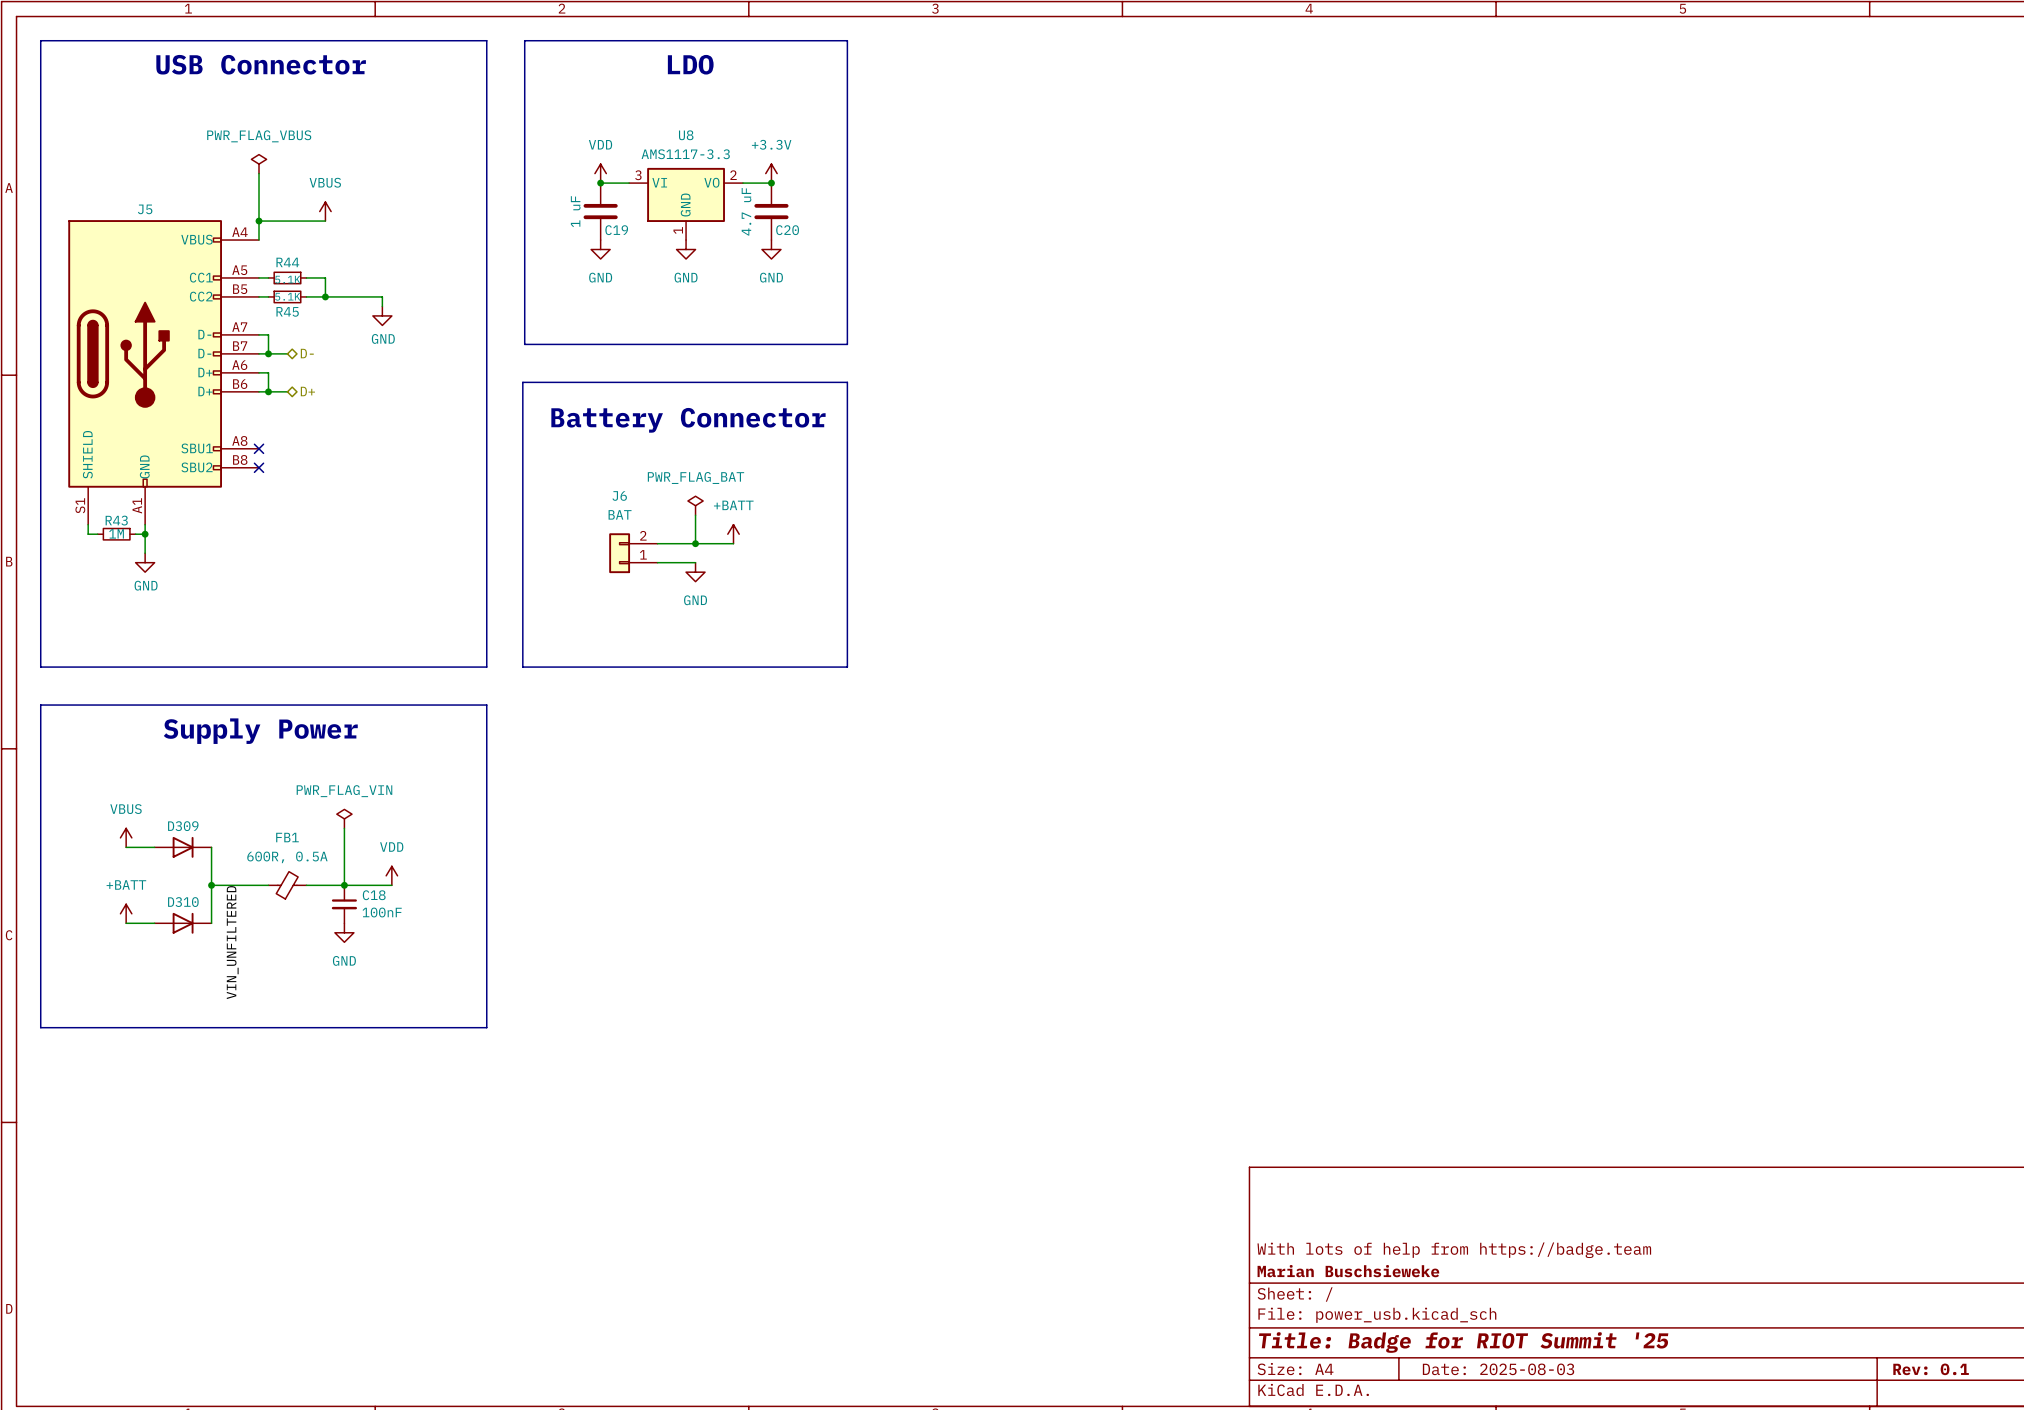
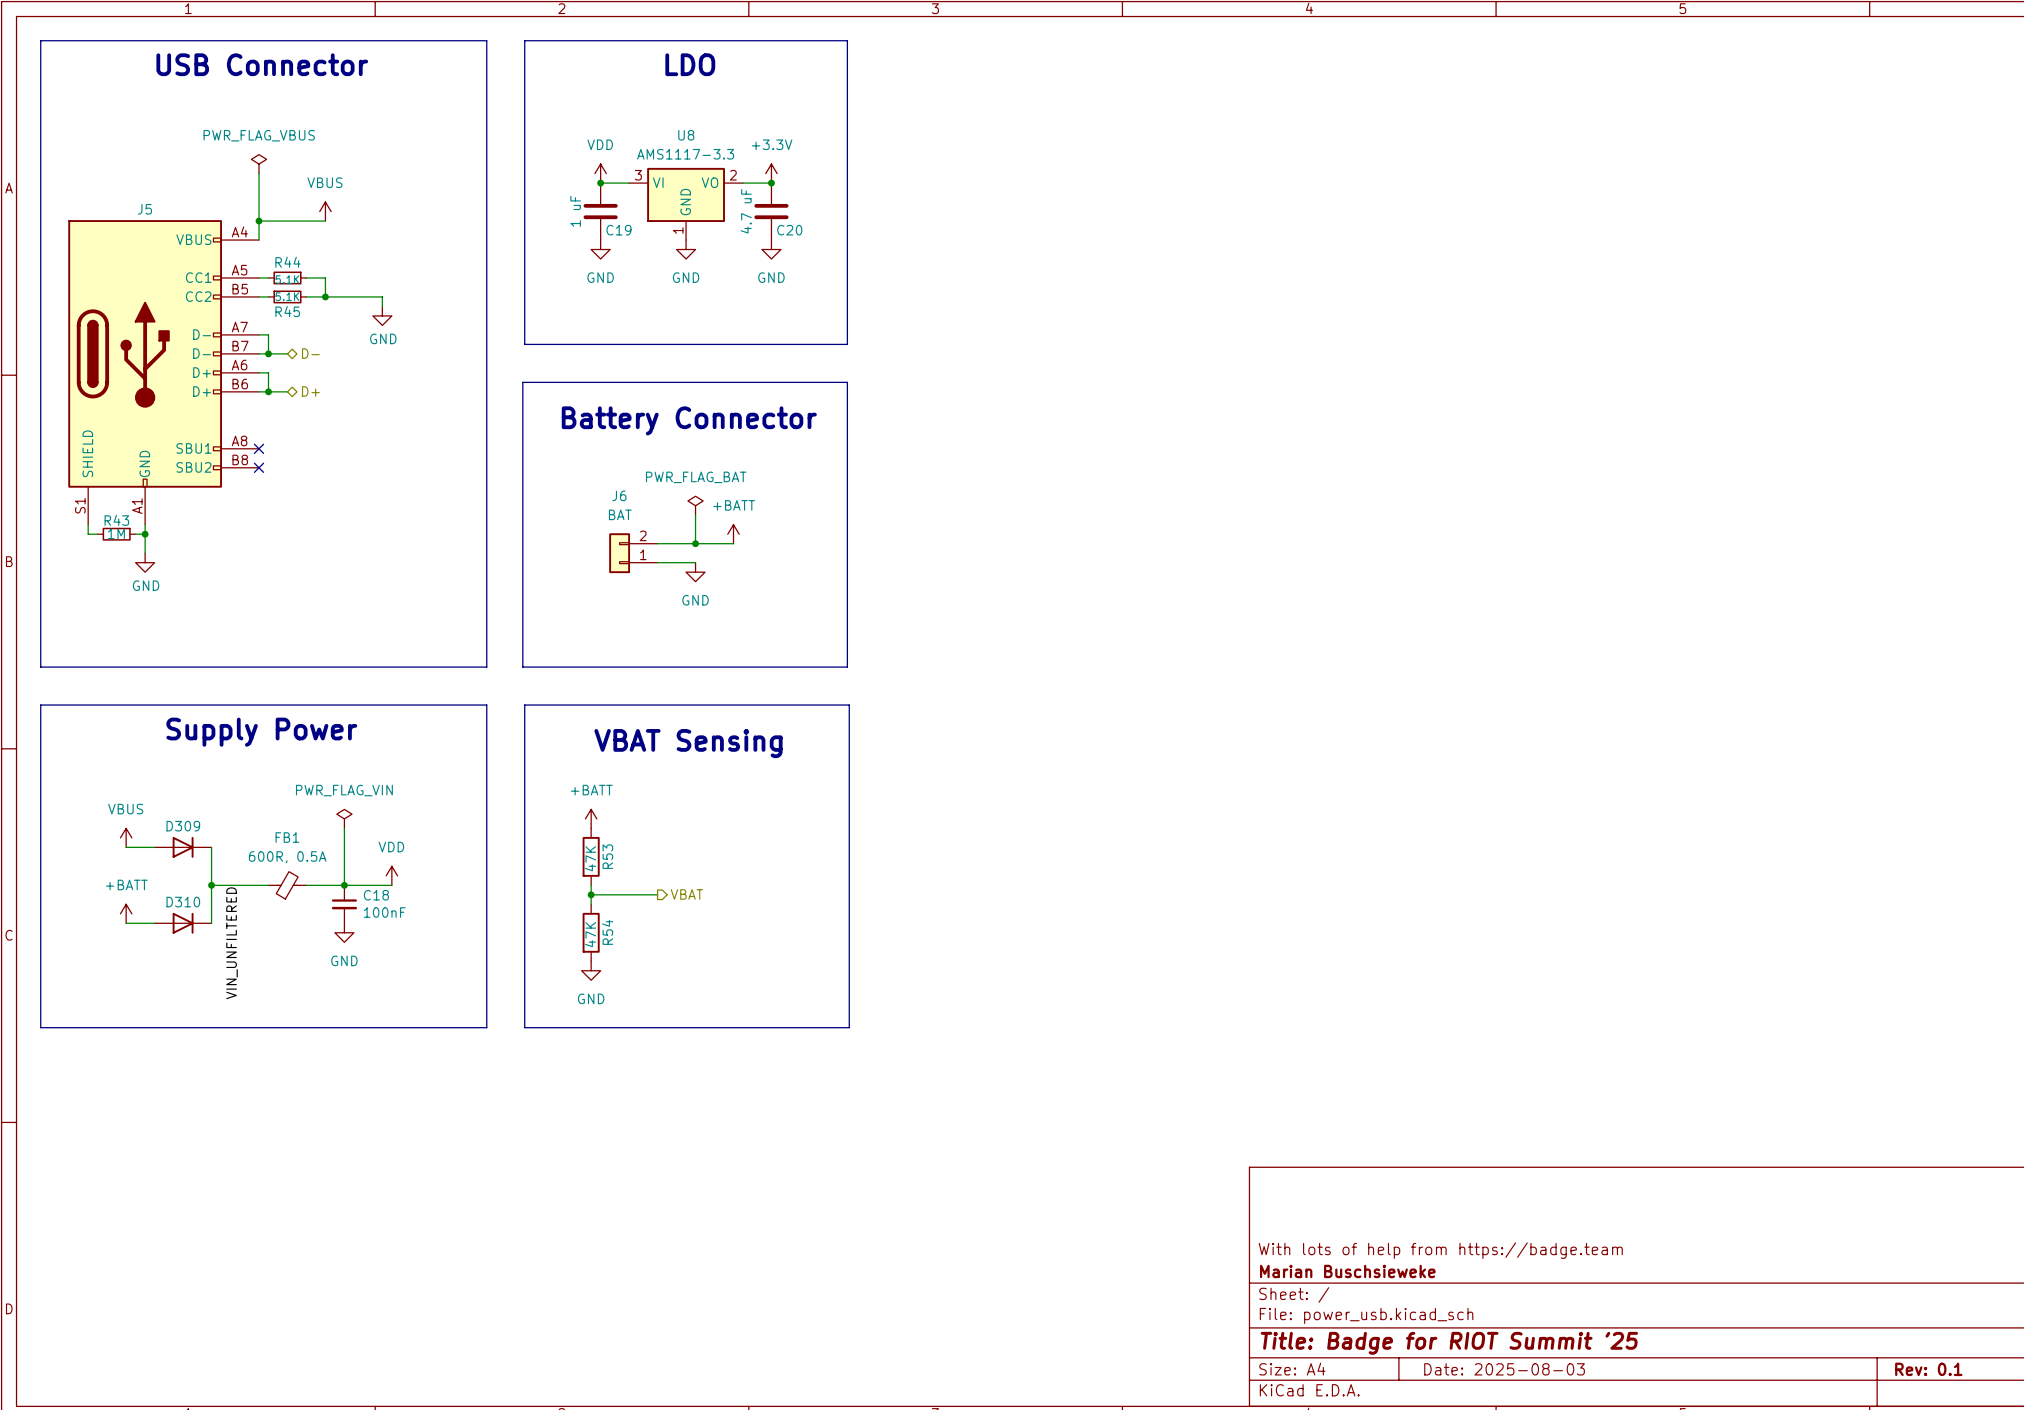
line: none -> (524, 705) (849, 705) (849, 1027) (524, 1027) (524, 705)
text: none -> VBAT Sensing (688, 743)
power symbol: none -> +BATT (591, 818)
R53: none -> 47K (591, 856)
wire: none -> (591, 885) (591, 904)
wire: none -> (591, 894) (657, 894)
junction: none -> (591, 894)
hierarchical label: none -> VBAT (686, 894)
R54: none -> 47K (591, 932)
power symbol: none -> GND (591, 970)

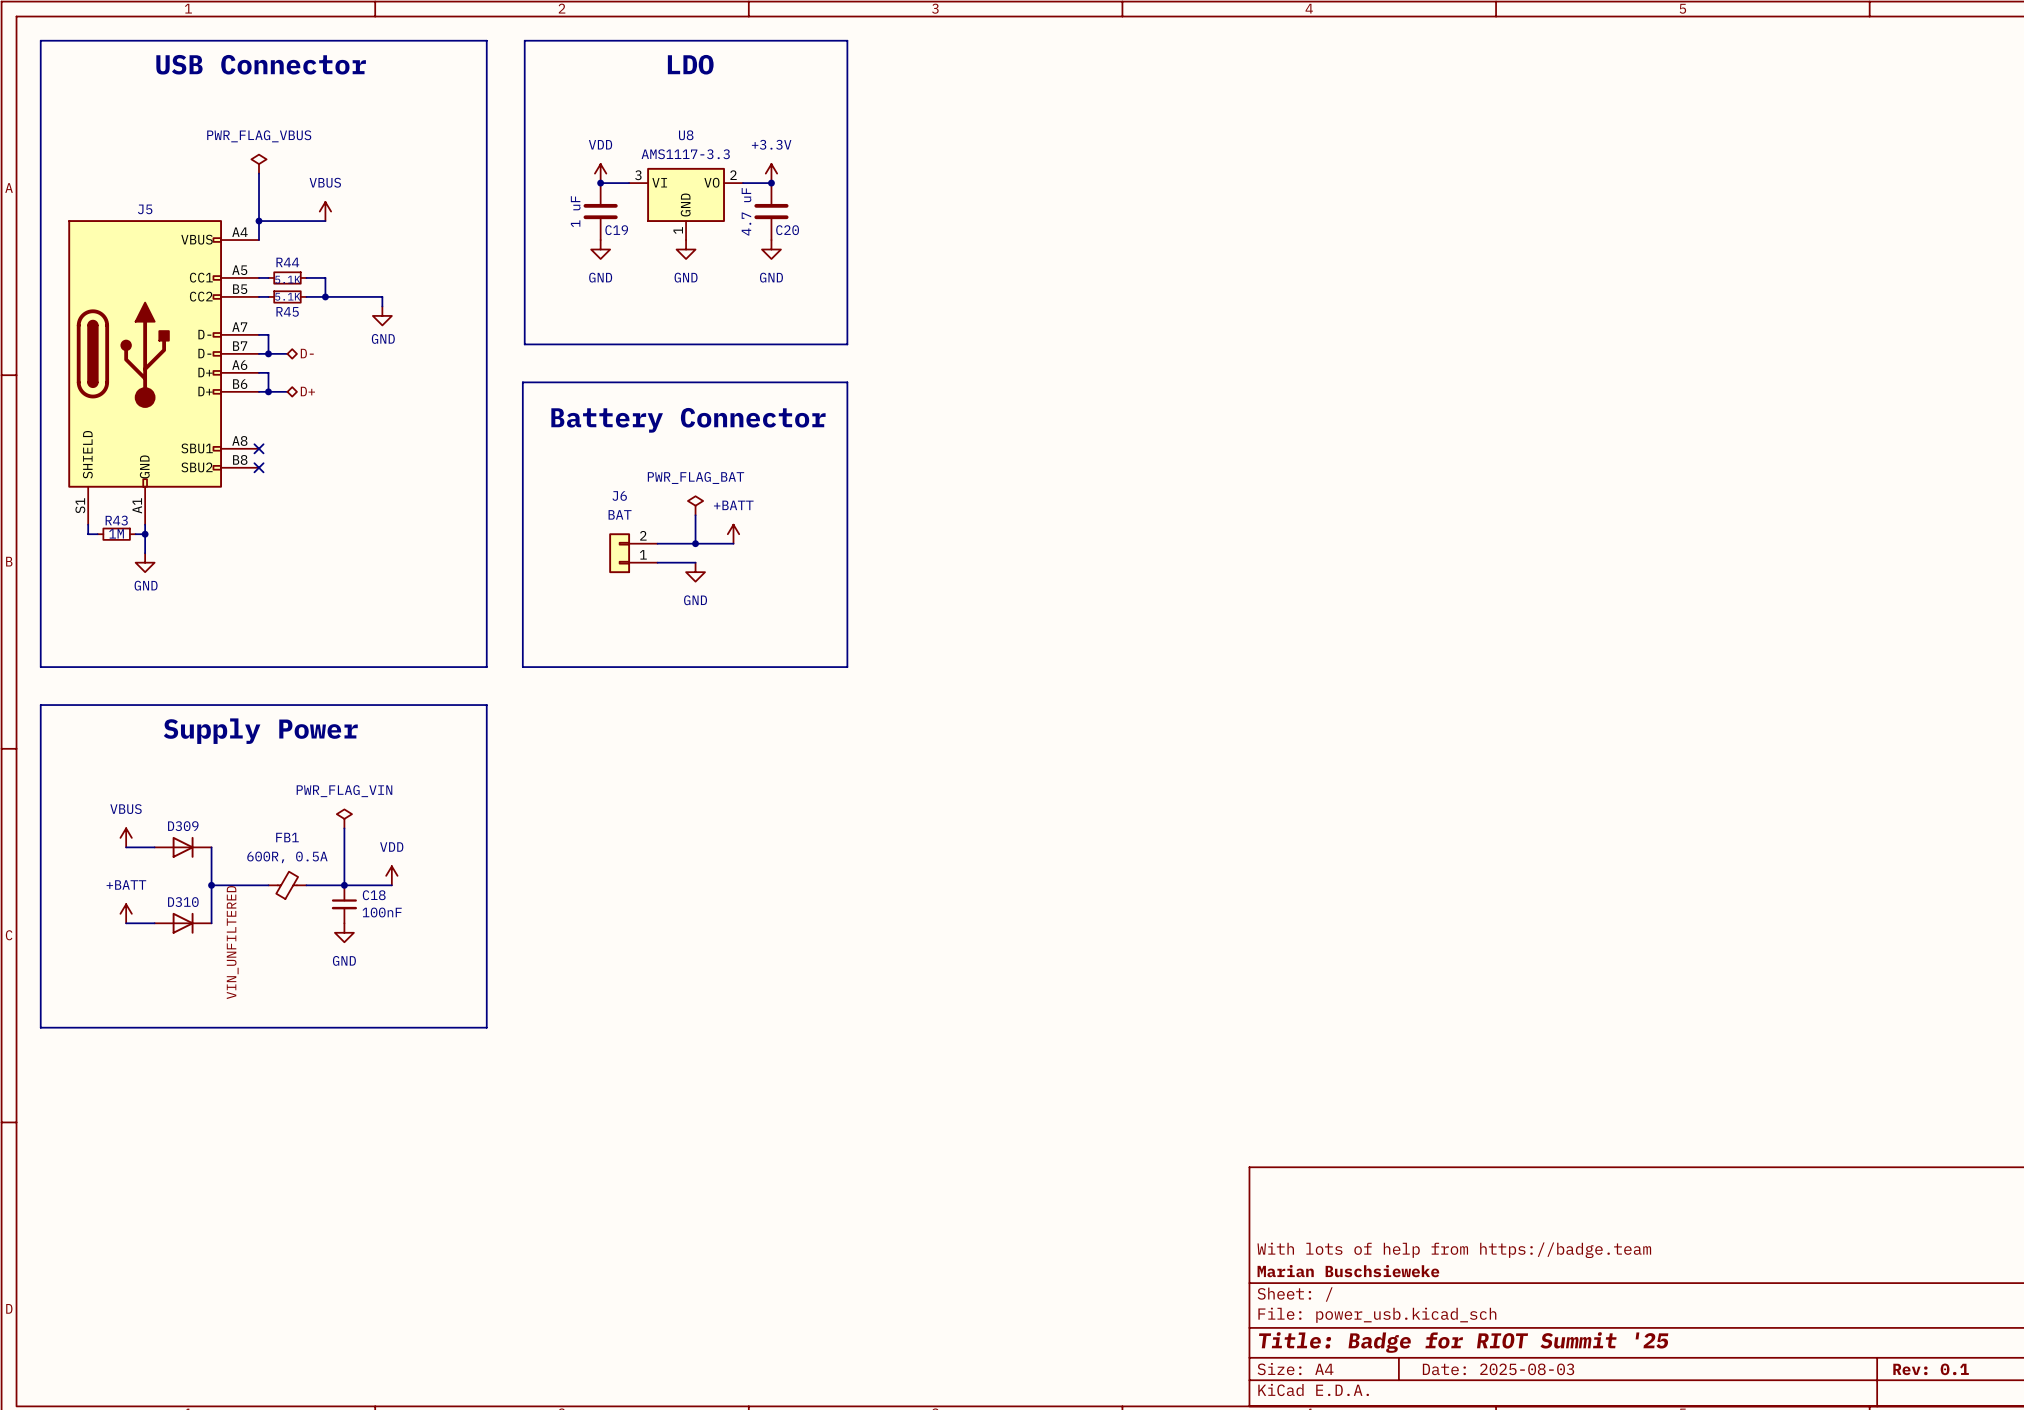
line: (524, 705) (849, 705) (849, 1027) (524, 1027) (524, 705) -> none
text: VBAT Sensing (688, 743) -> none
power symbol: +BATT (591, 818) -> none
R53: 47K (591, 856) -> none
wire: (591, 885) (591, 904) -> none
wire: (591, 894) (657, 894) -> none
junction: (591, 894) -> none
hierarchical label: VBAT (686, 894) -> none
R54: 47K (591, 932) -> none
power symbol: GND (591, 970) -> none

